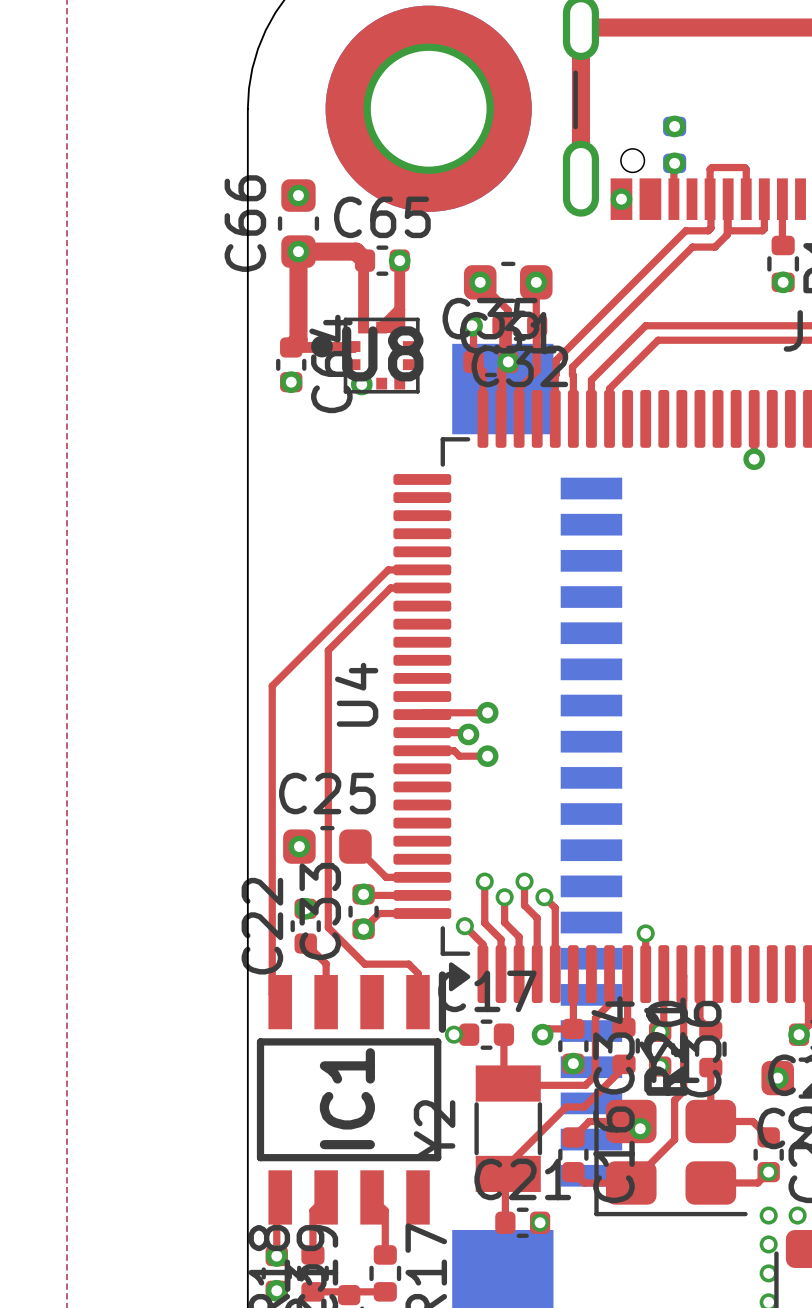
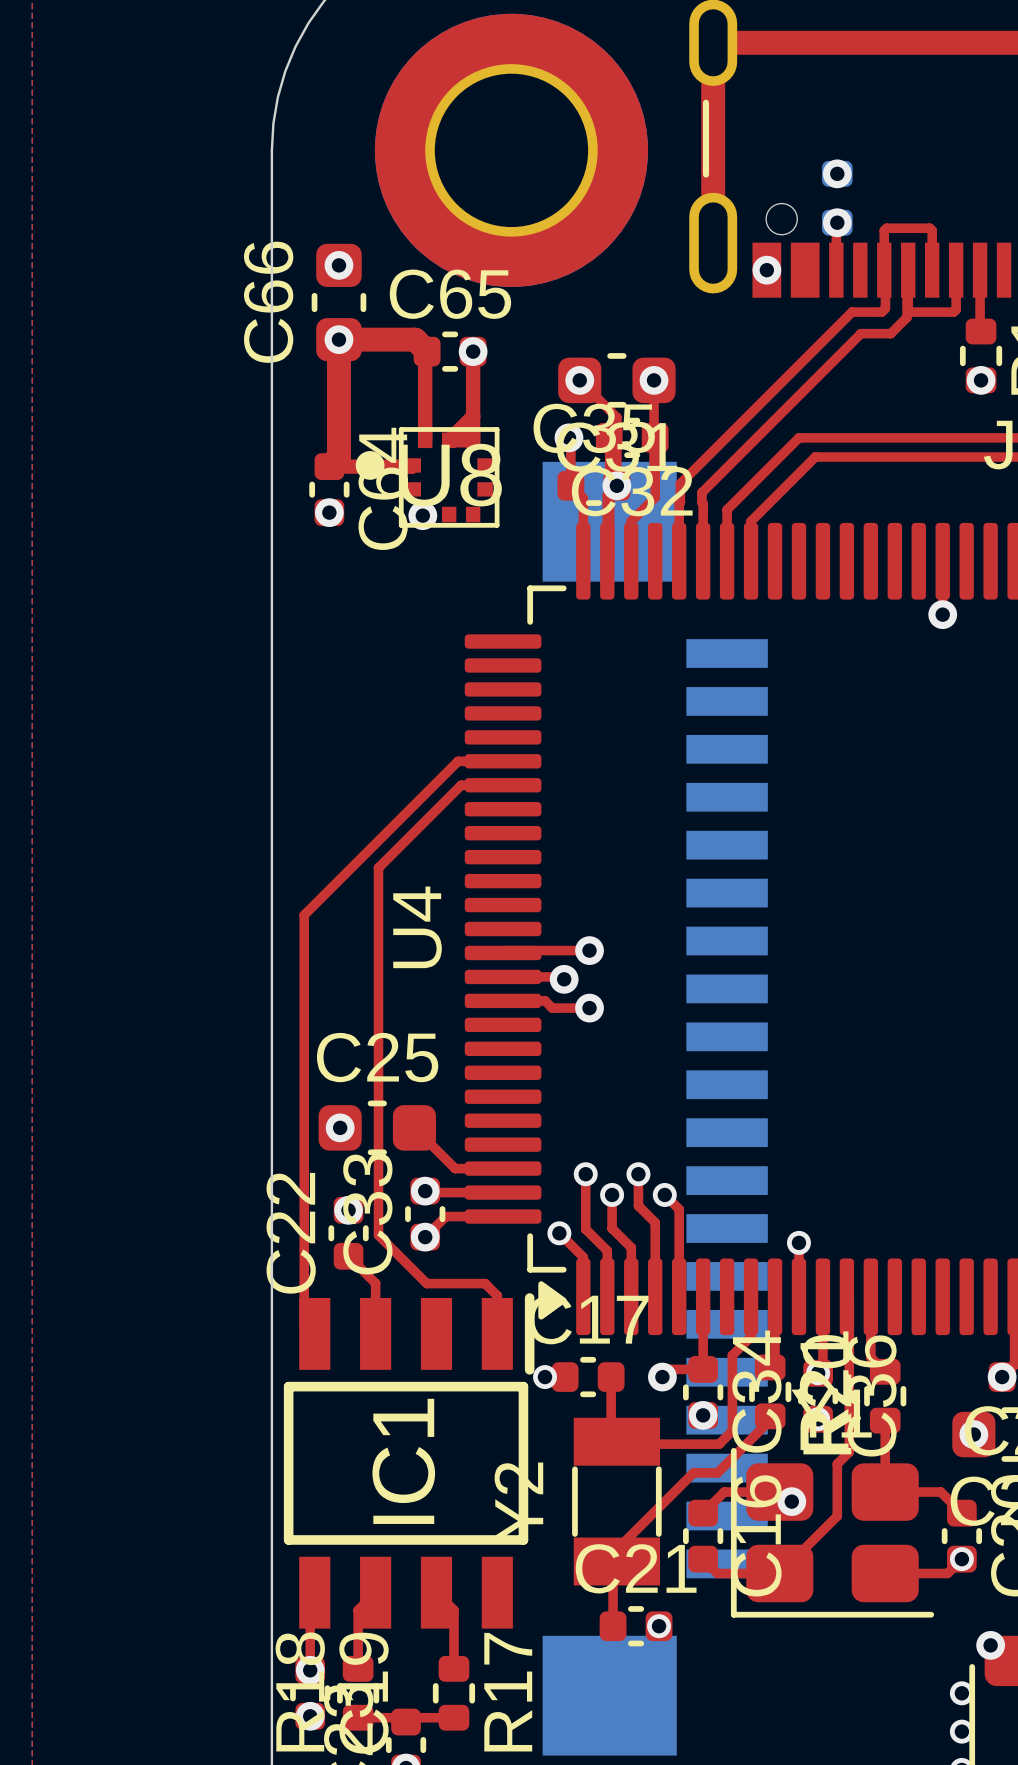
via: (768, 1215) -> none
via: (797, 1215) -> none
via: none -> (990, 1645)
via: (768, 1244) -> none

